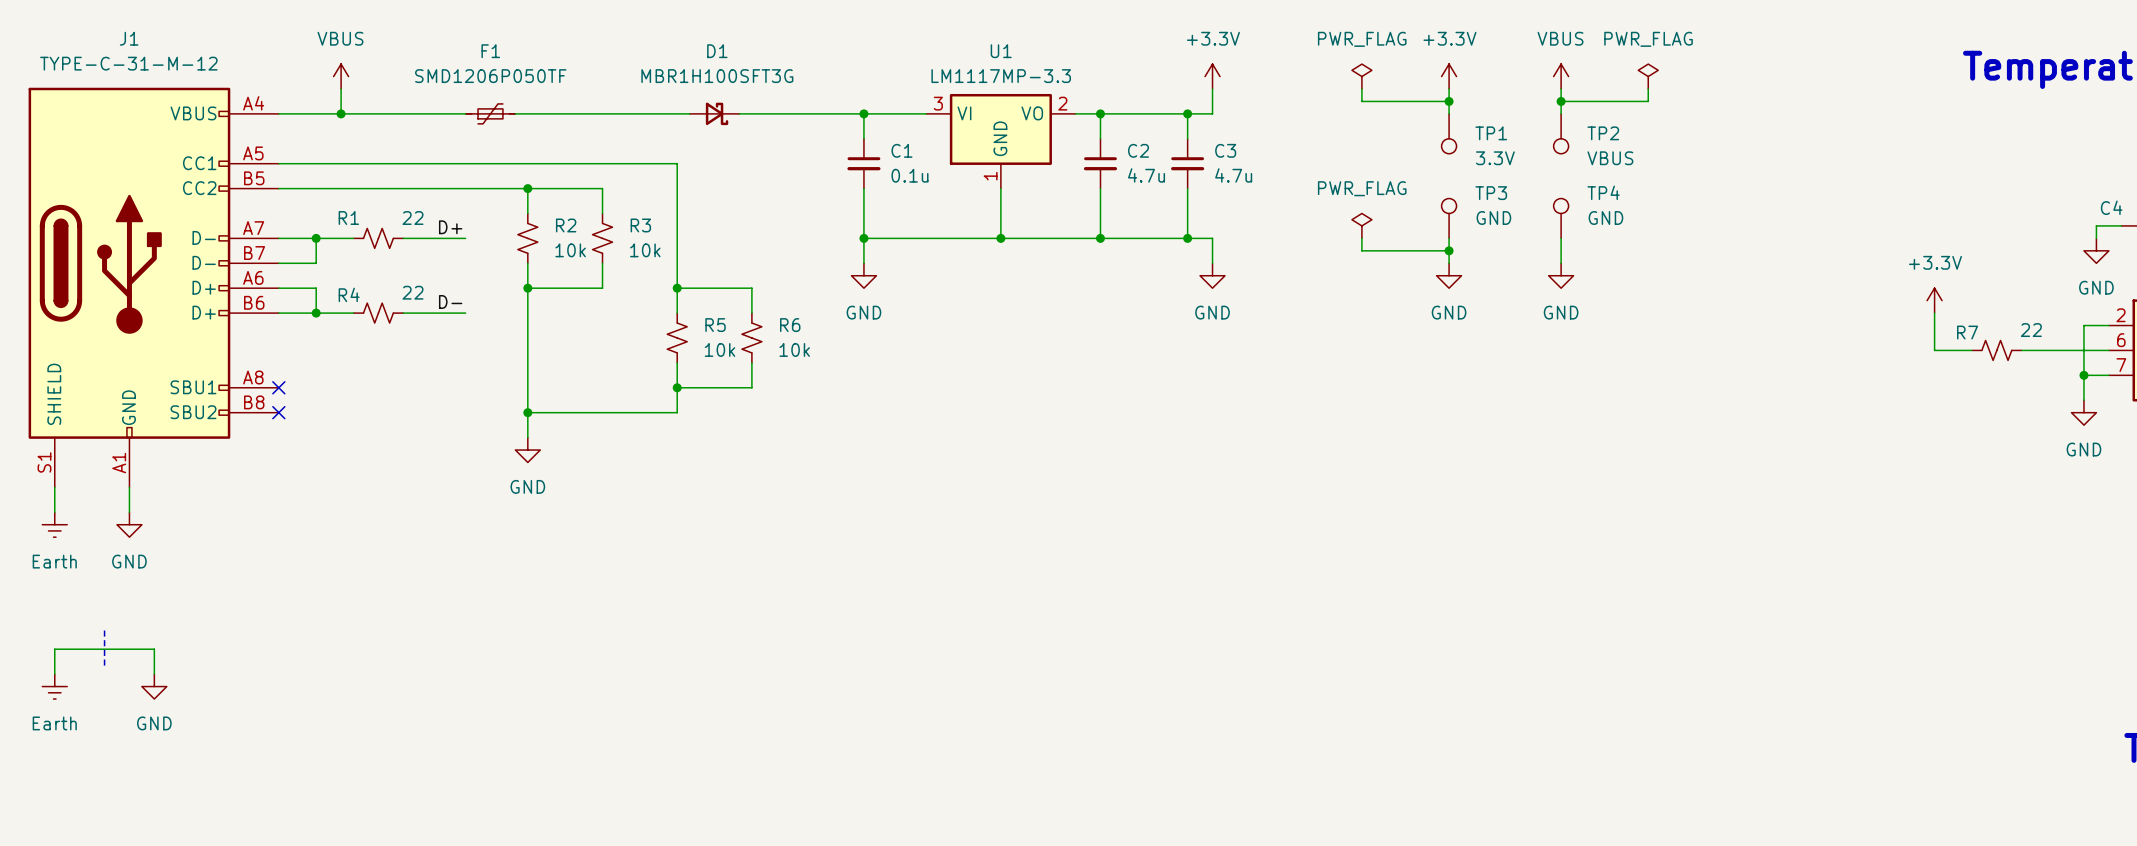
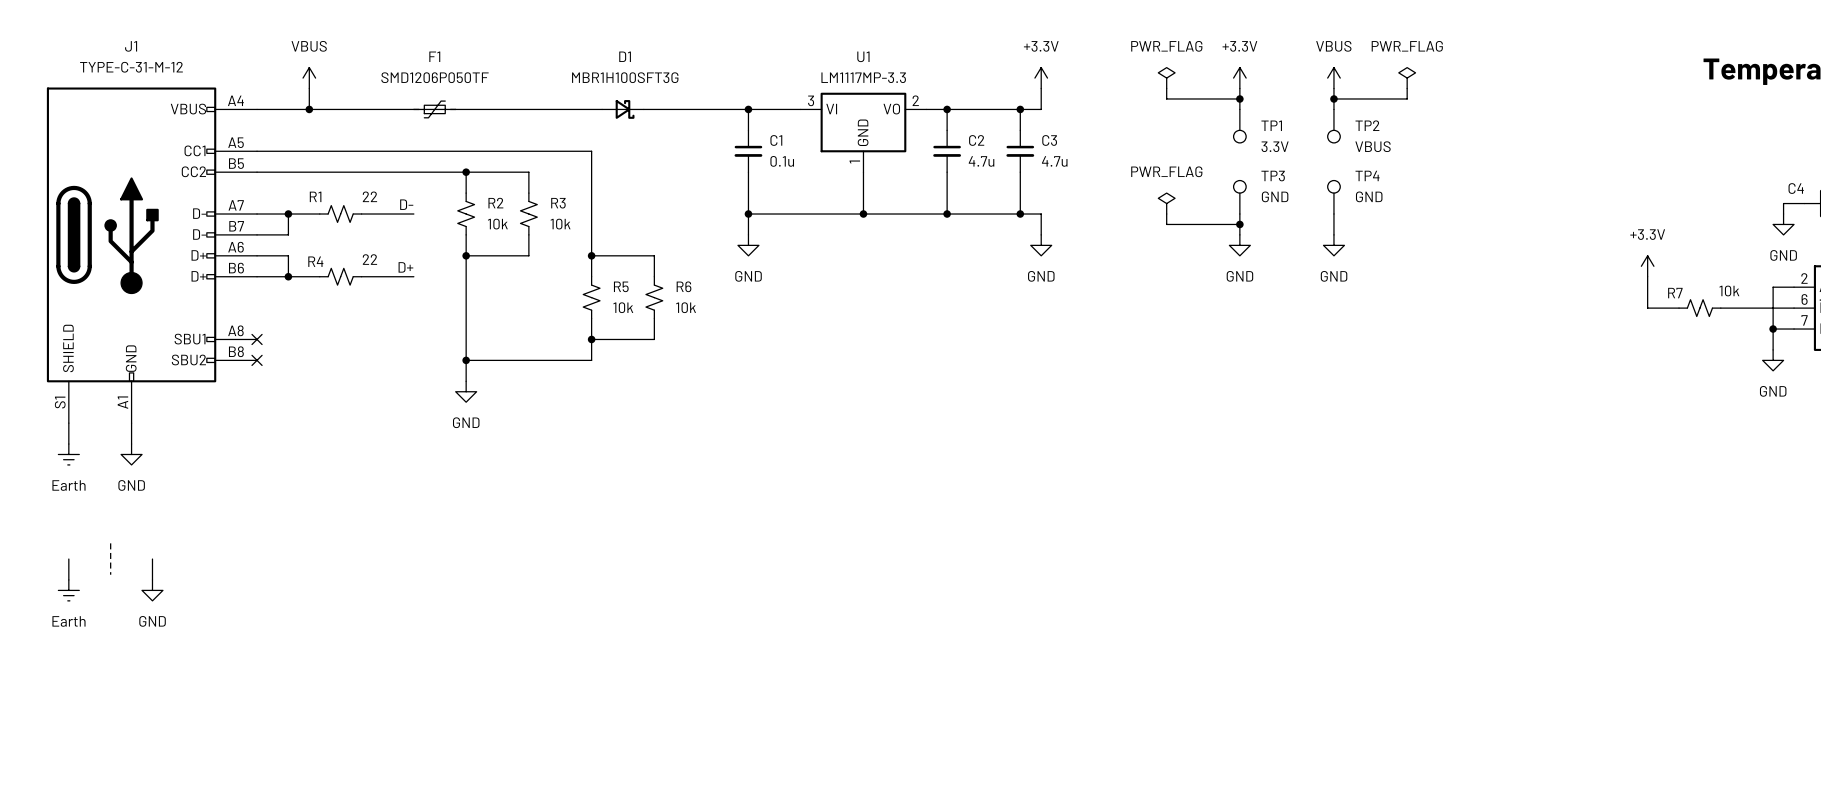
label: D+ (450, 227) -> D- (406, 204)
label: D- (450, 301) -> D+ (405, 267)
R7 value: 22 (2031, 330) -> 10k (1729, 290)
wire: (54, 649) (154, 649) -> none

